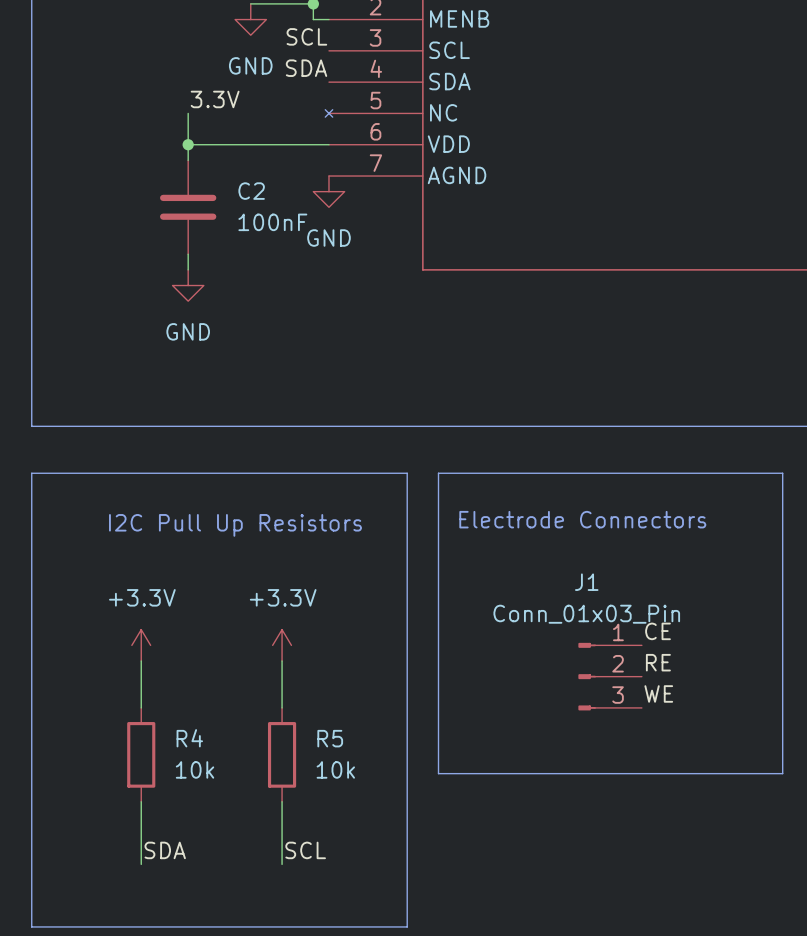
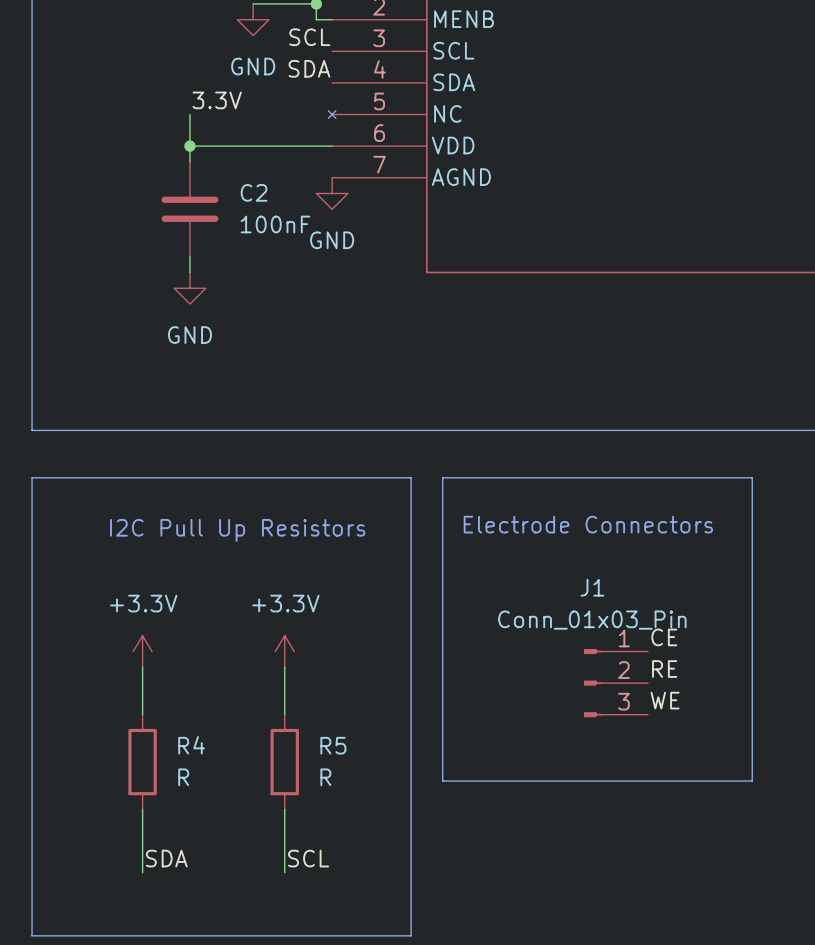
line: (745, 473) (782, 473) (782, 773) (745, 773) -> (752, 477) (752, 781)
R4 value: 10k (195, 769) -> R (183, 777)
R5 value: 10k (335, 769) -> R (325, 777)

